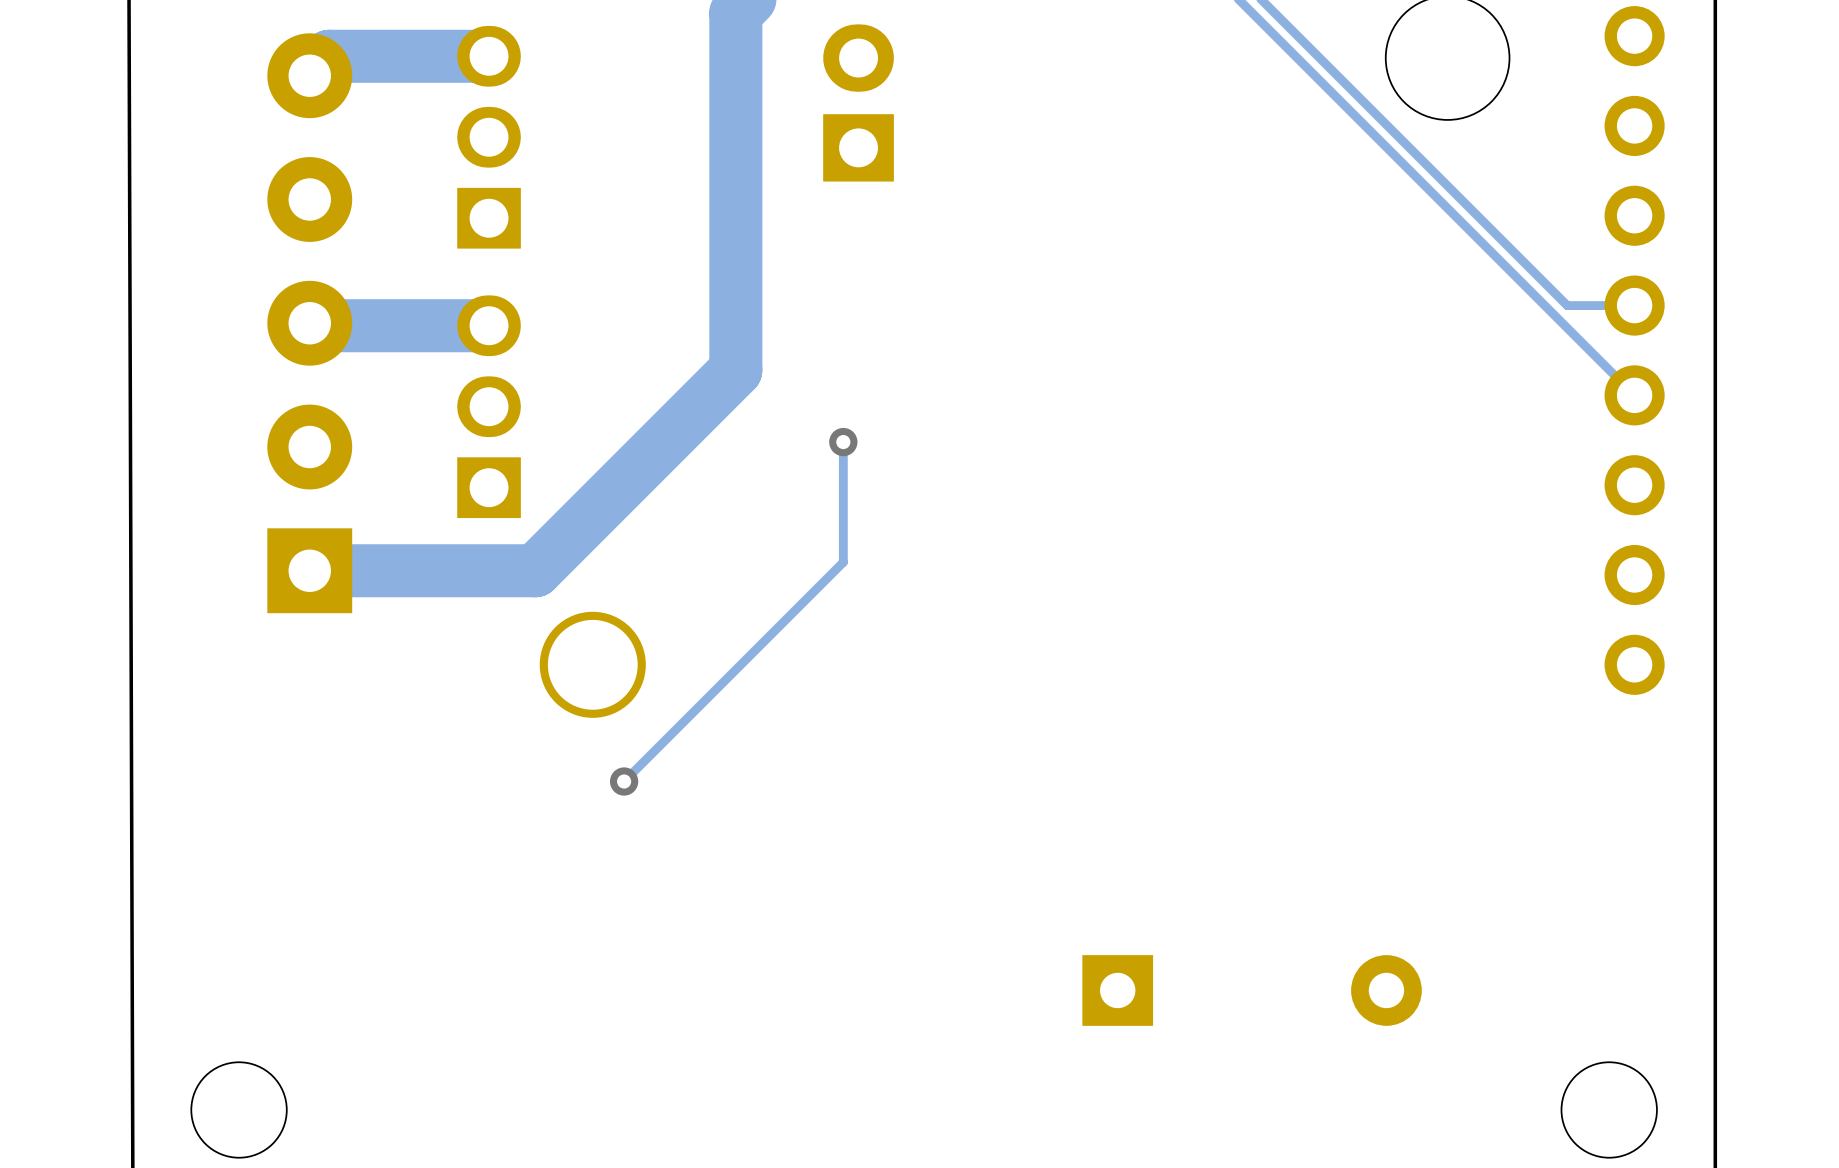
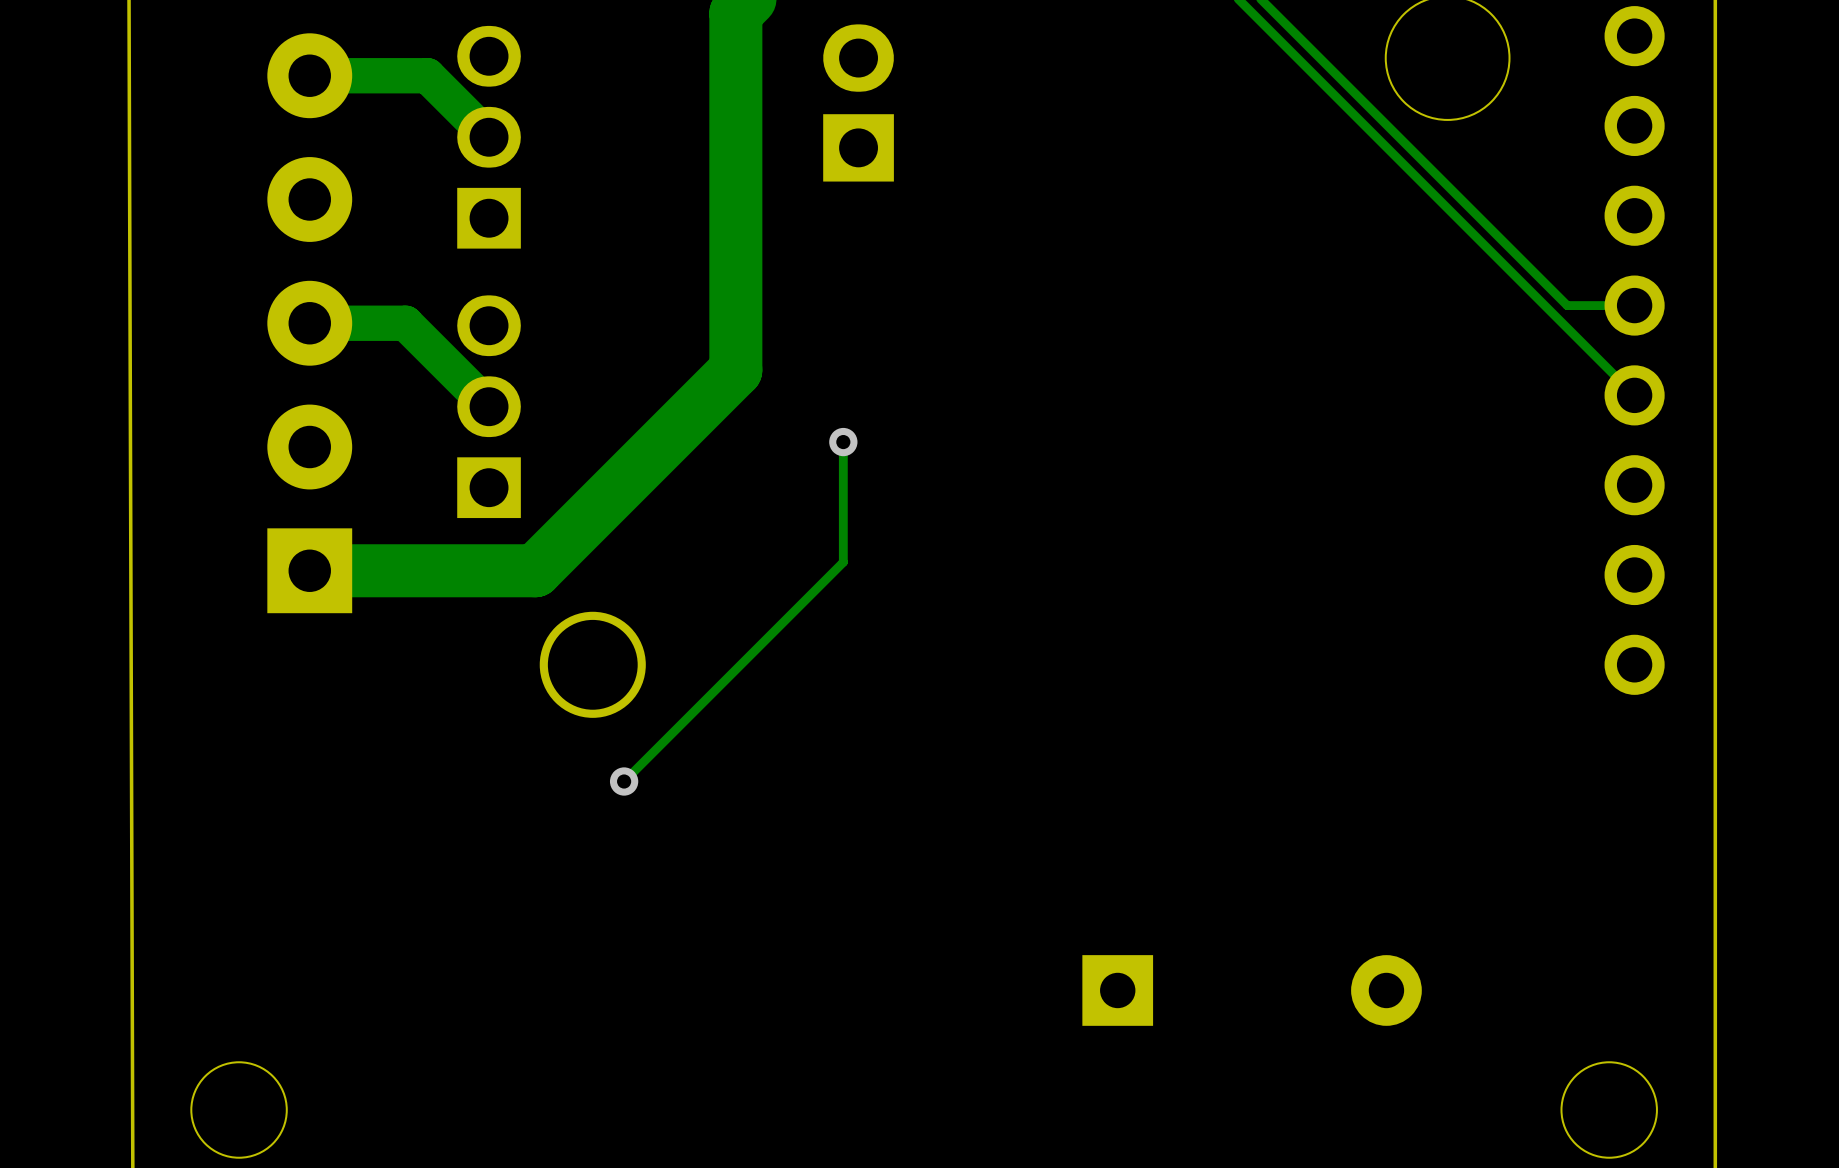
track: (489, 56) (329, 56) (309, 75) -> (489, 137) (427, 75) (309, 75)
track: (309, 323) (312, 325) (489, 325) -> (309, 323) (405, 323) (489, 406)

